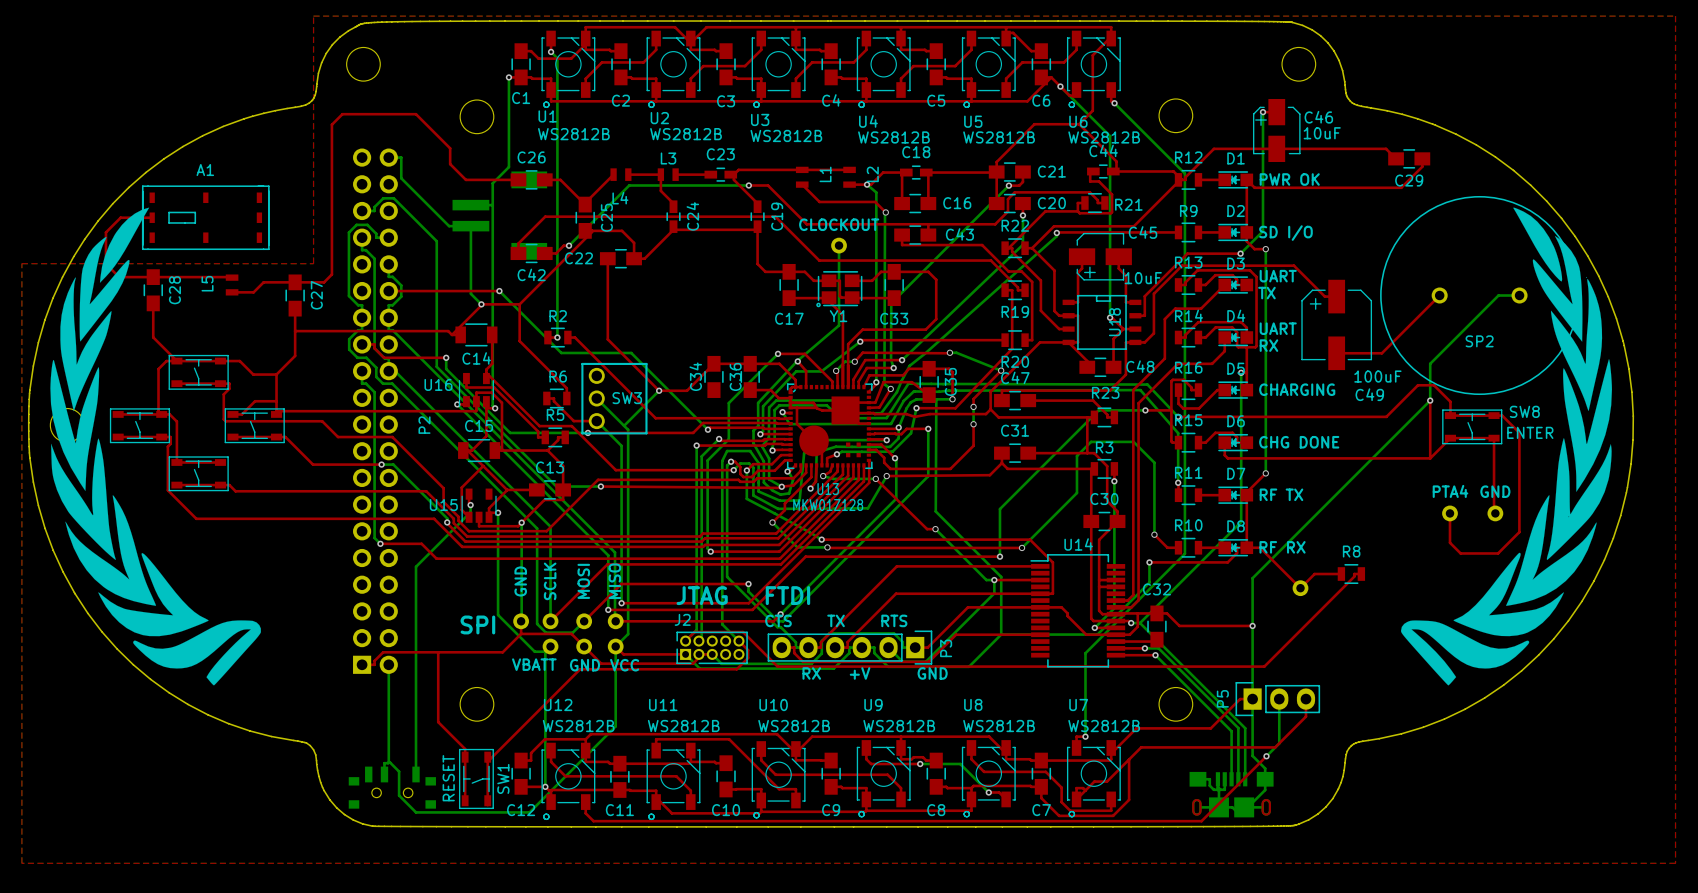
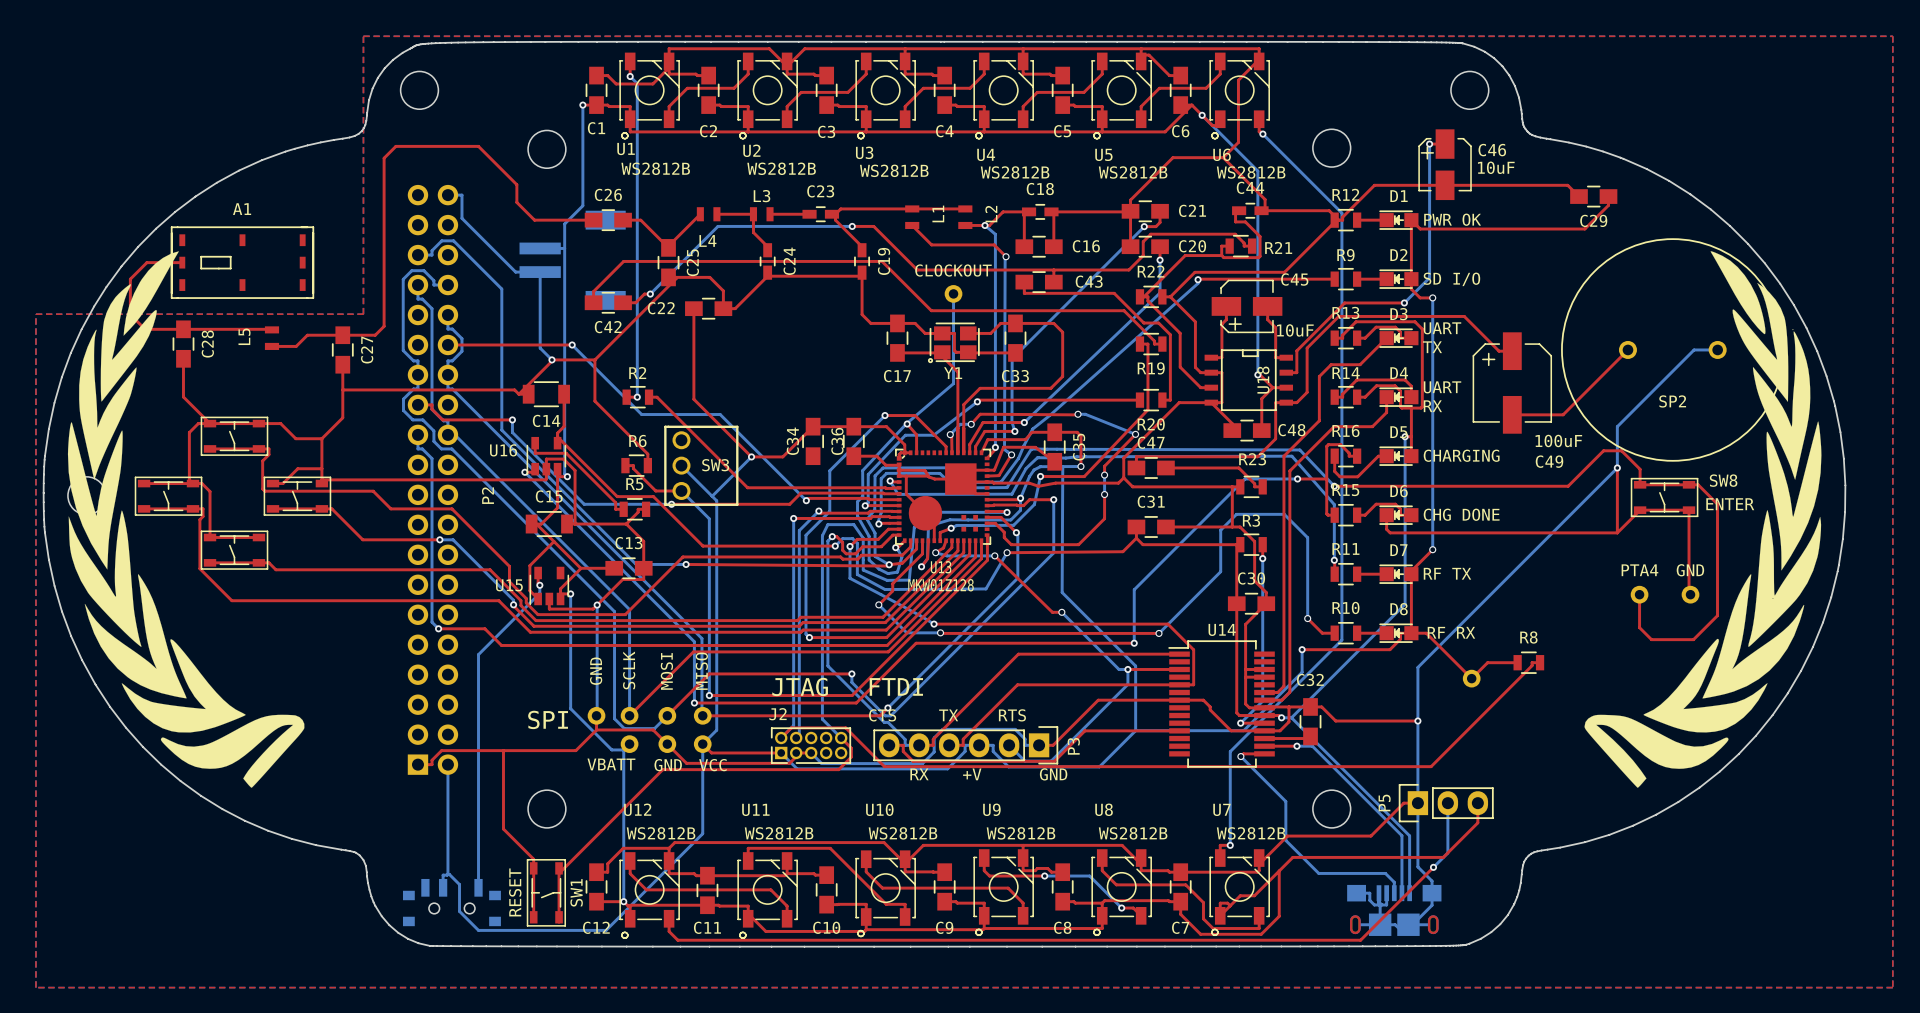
top track: (1115, 655) (1155, 655) -> (1264, 753) (1243, 753) (1240, 756)
bottom track: (1155, 655) (1231, 731) (1231, 769) -> (1240, 756) (1285, 801) (1285, 840) (1318, 873) (1385, 873) (1394, 882)
via: (1155, 655) -> none
via: none -> (1240, 756)

